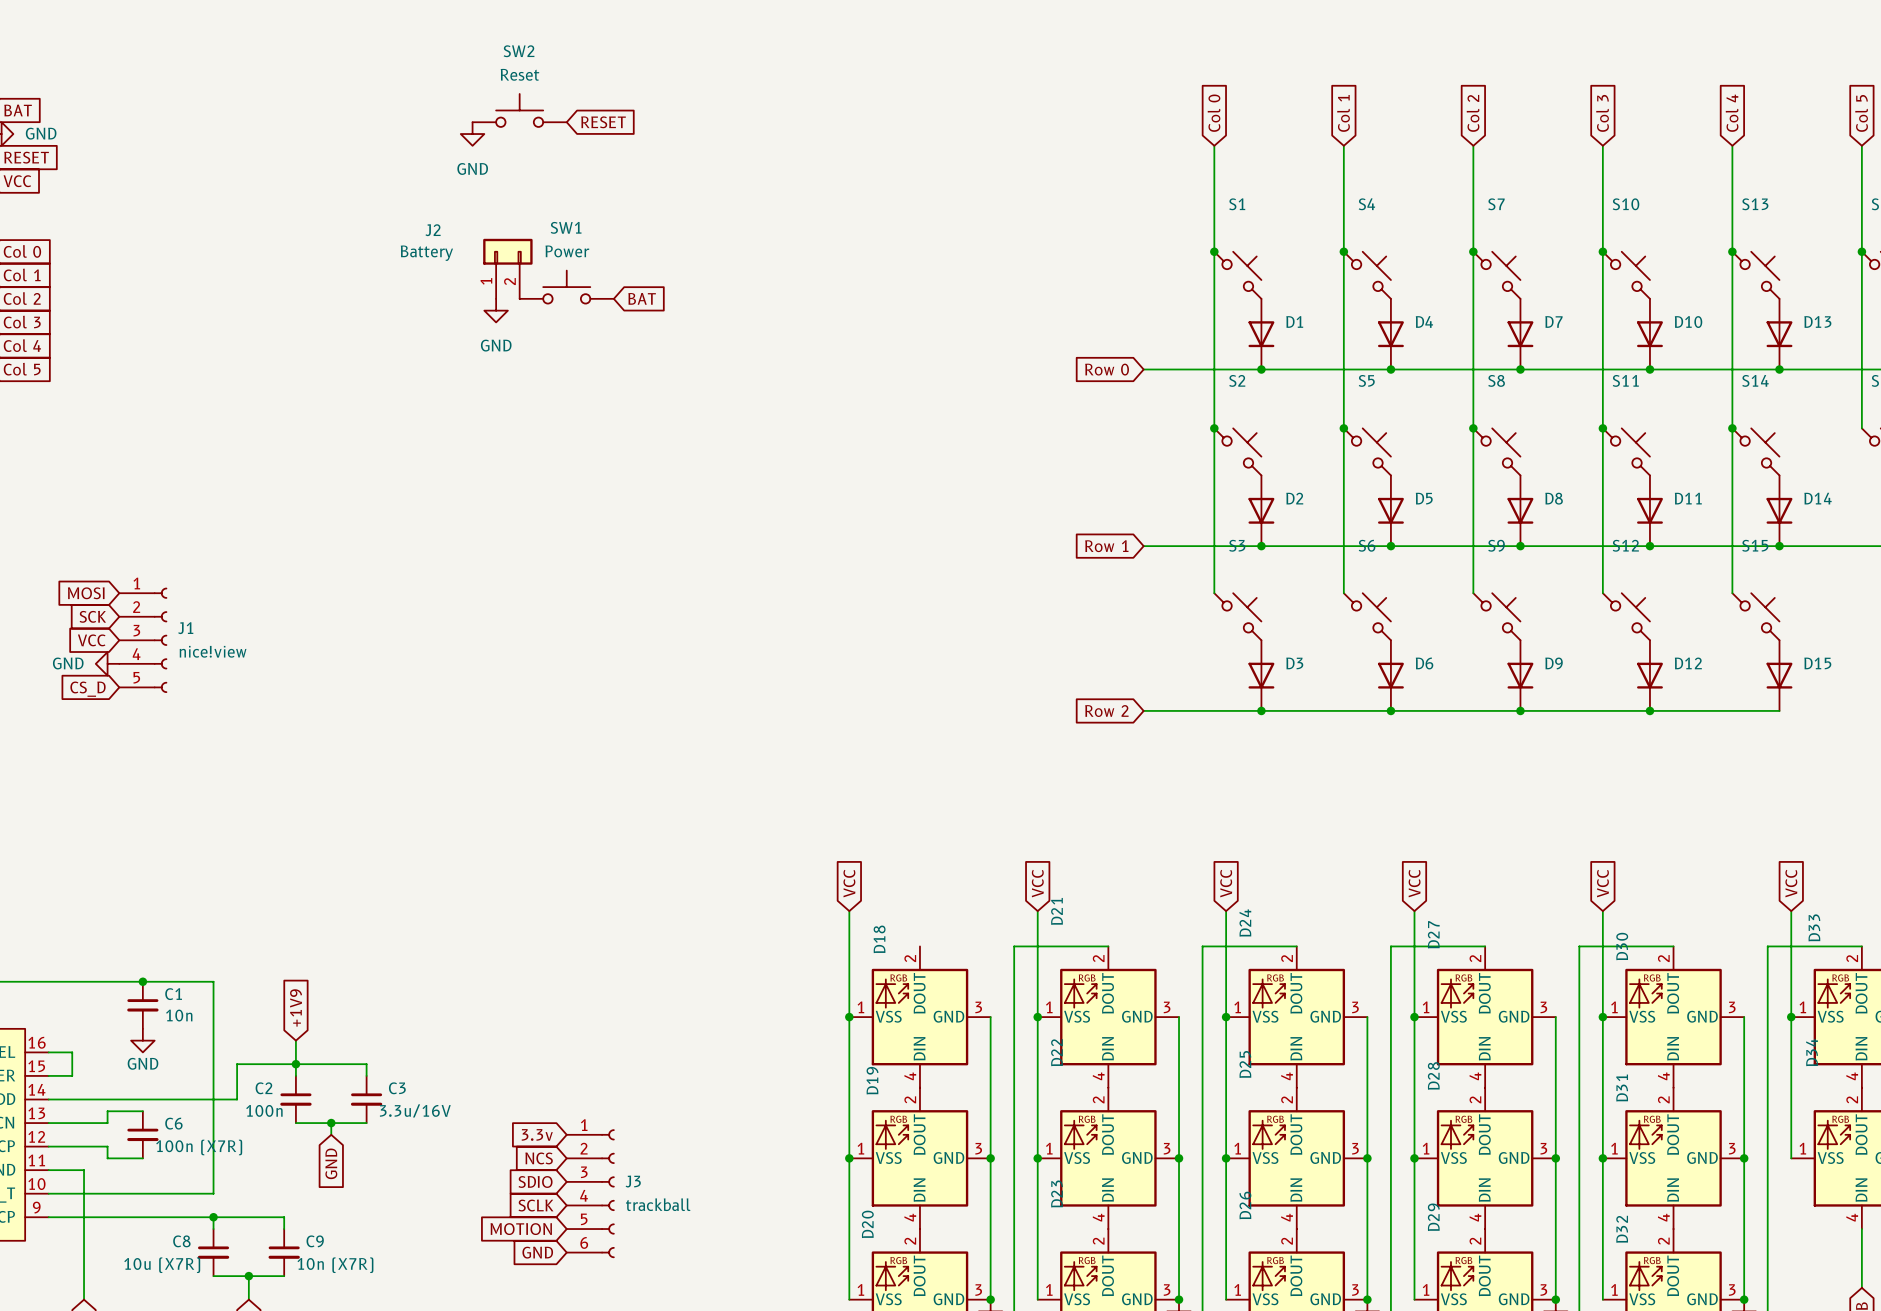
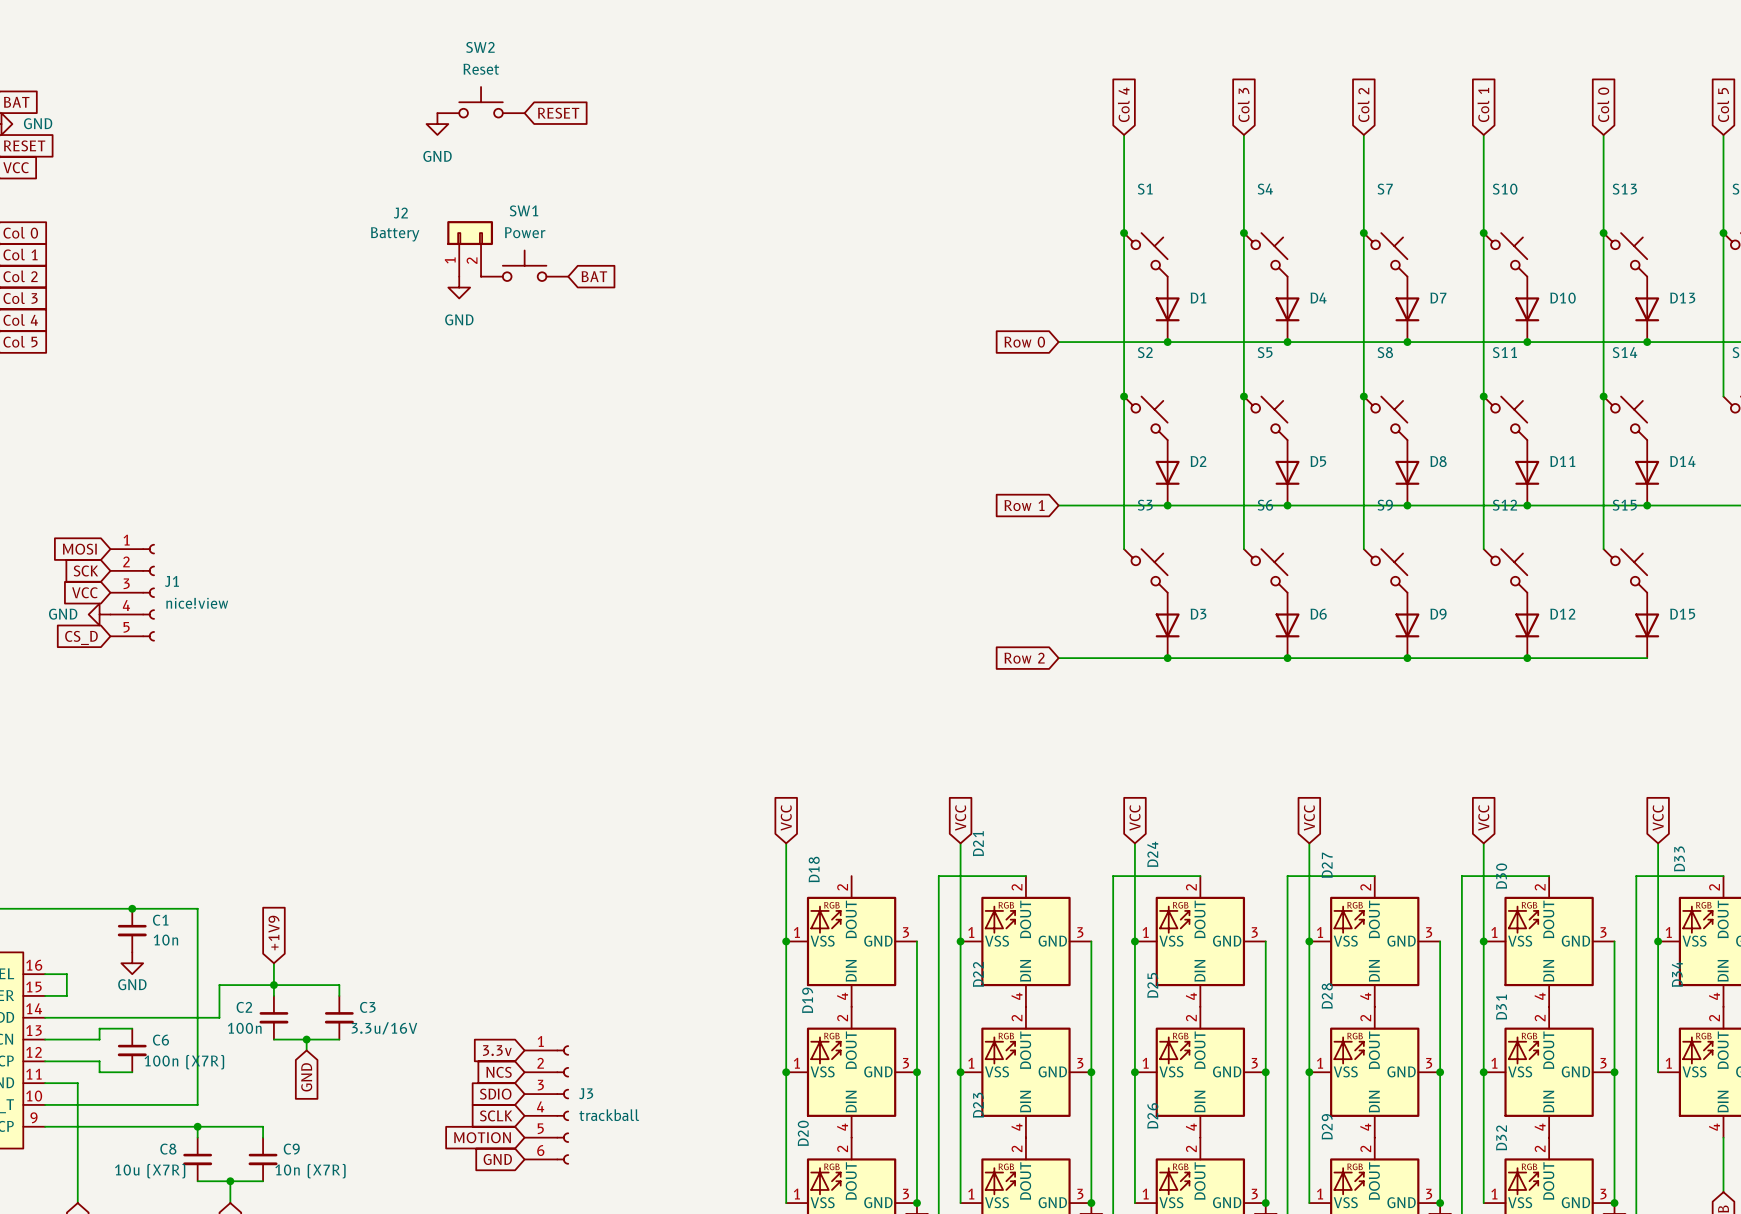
global label: Col 0 (1214, 113) -> Col 4 (1123, 104)
global label: Col 1 (1343, 113) -> Col 3 (1243, 104)
global label: Col 3 (1602, 113) -> Col 1 (1483, 104)
global label: Col 4 (1732, 113) -> Col 0 (1603, 104)

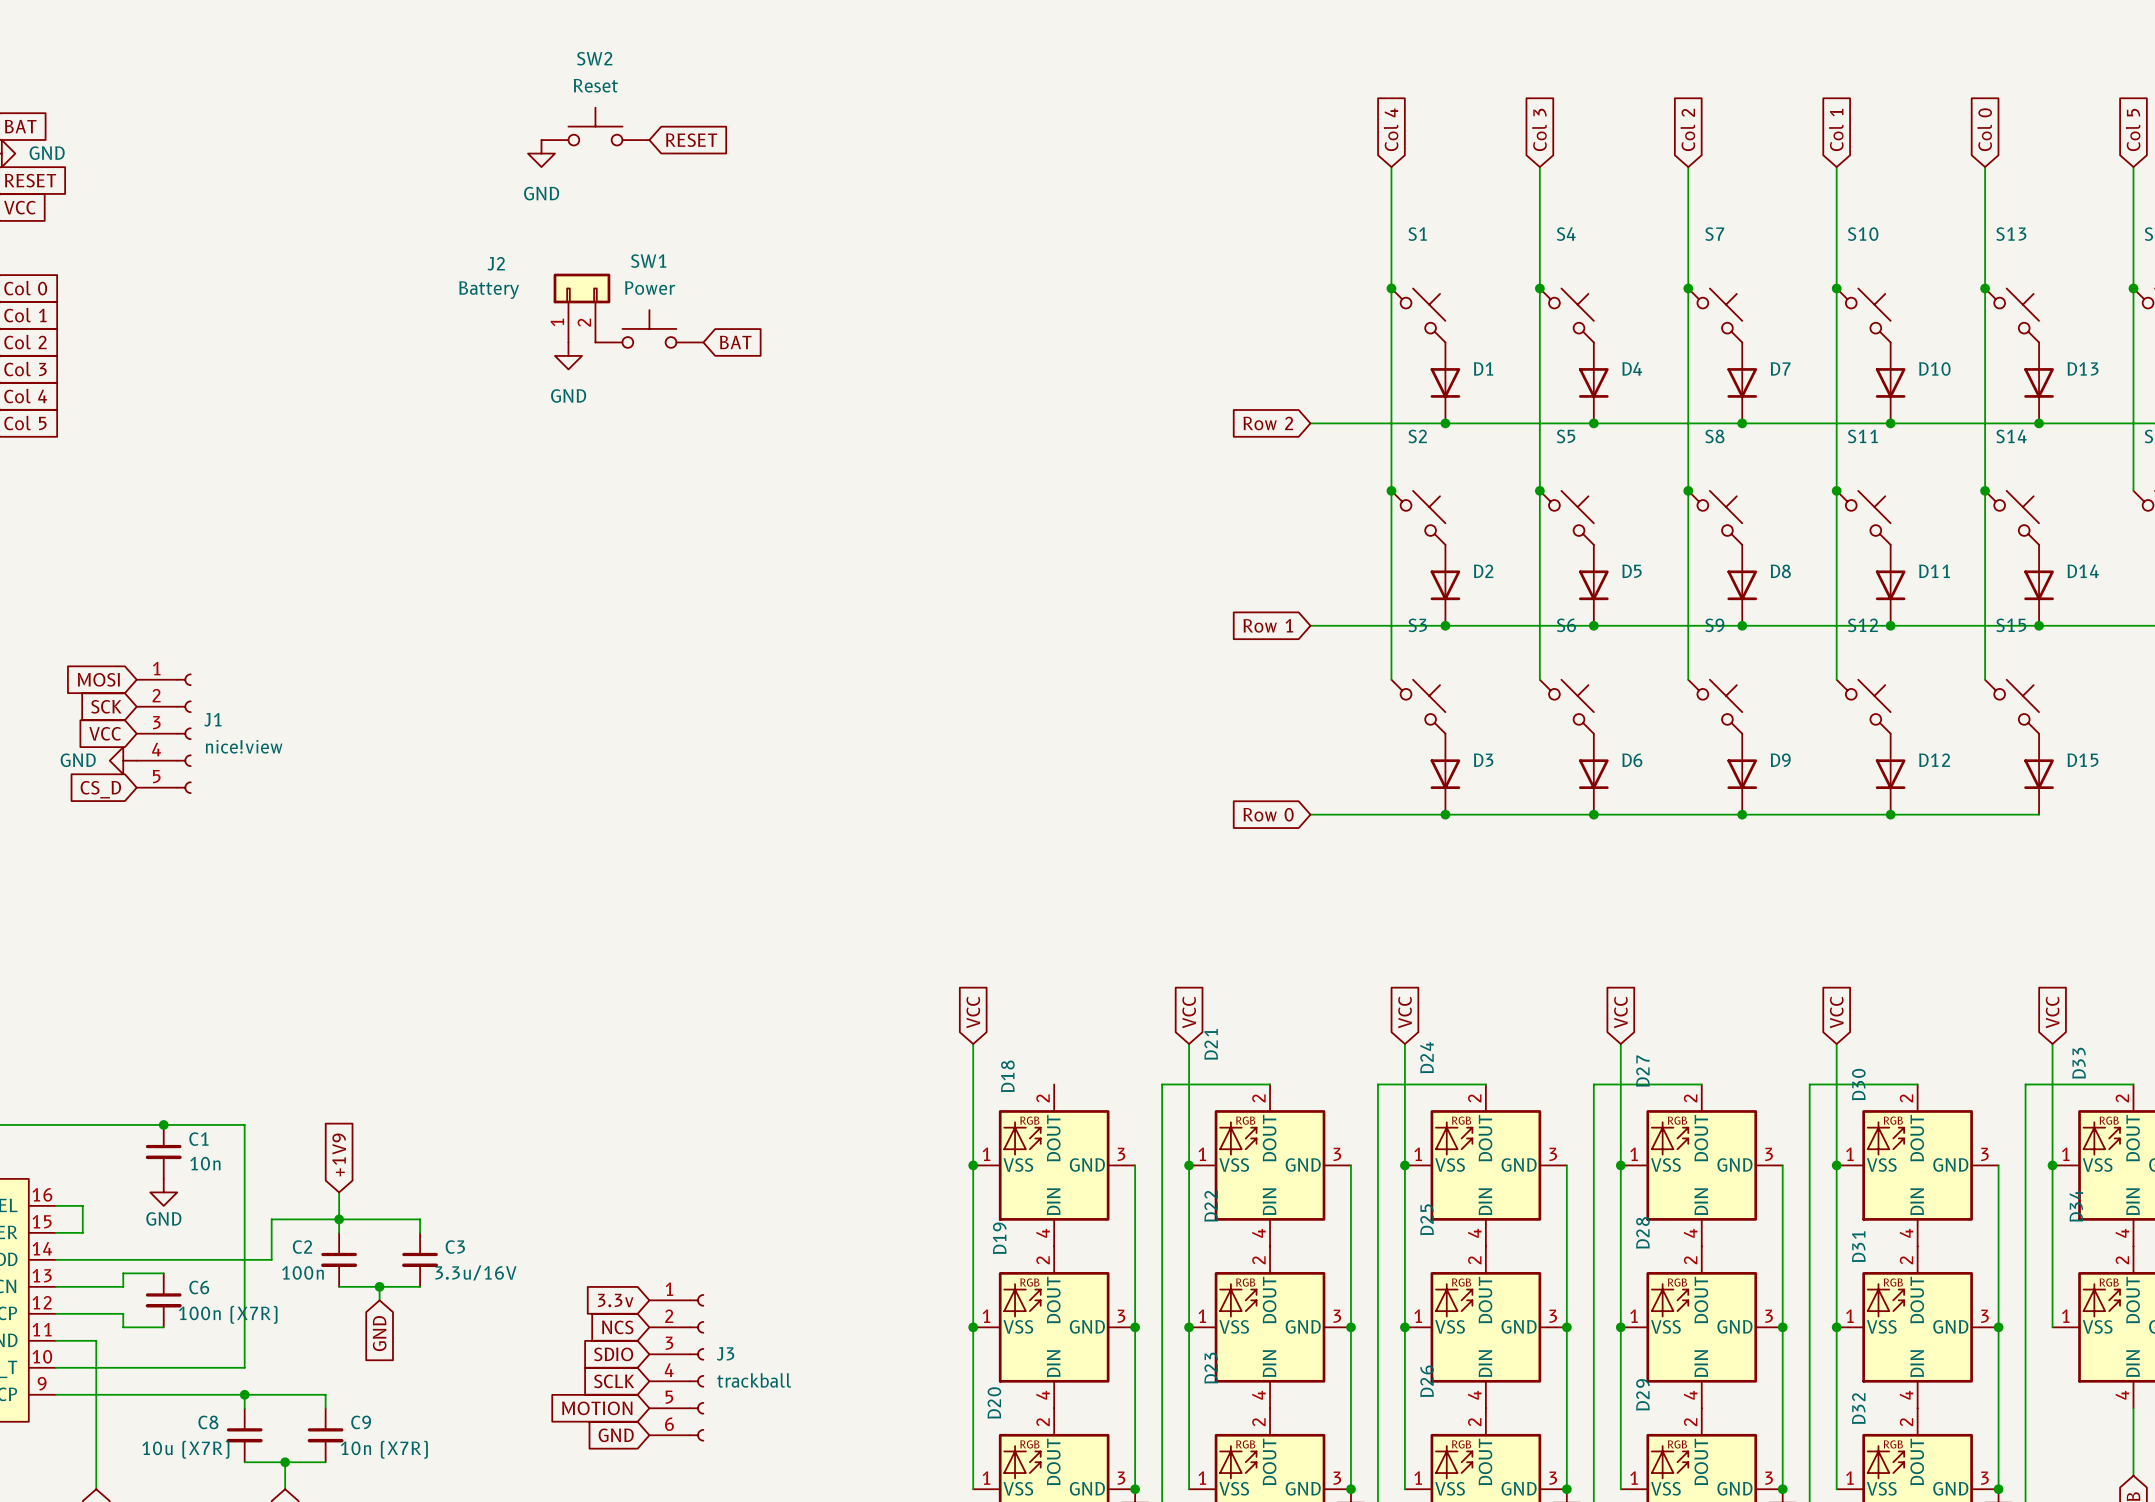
global label: Row 0 (1024, 342) -> Row 2 (1268, 423)
global label: Row 2 (1024, 658) -> Row 0 (1268, 814)

